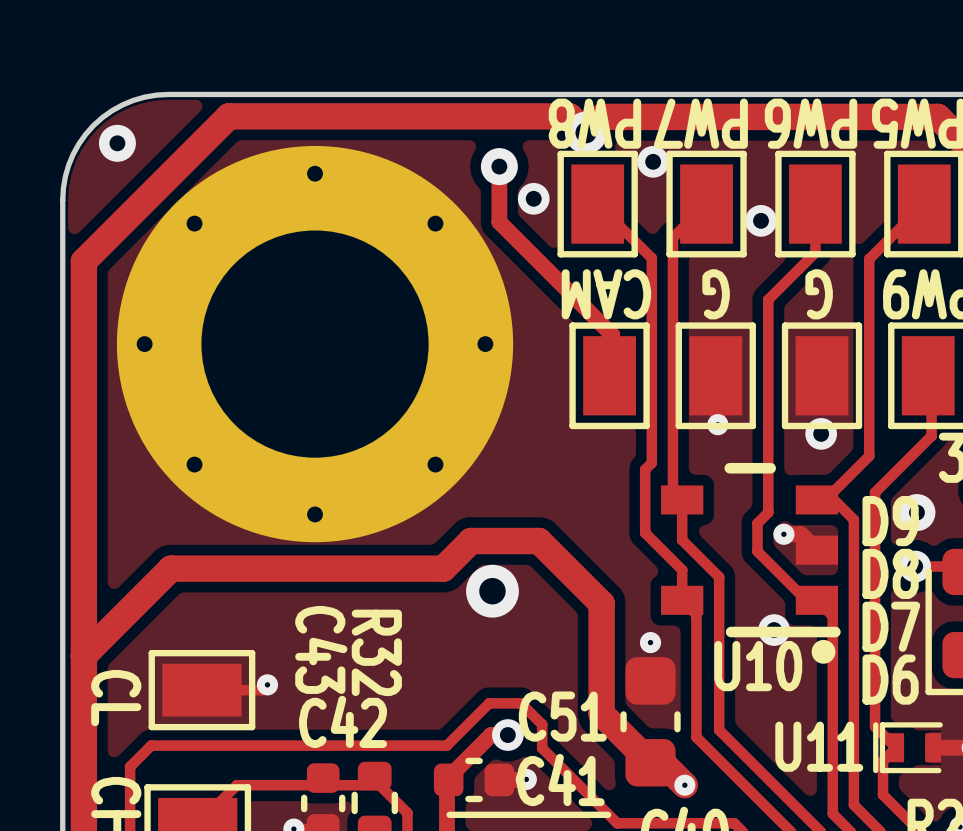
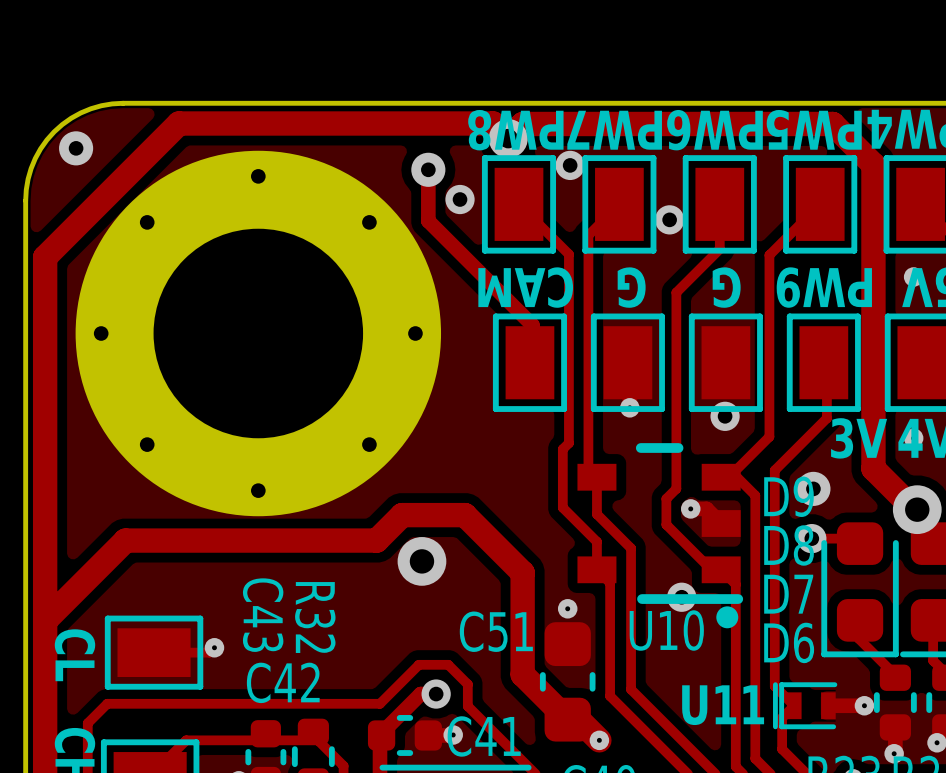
C51 name position: C51 (562, 716) -> C51 (496, 631)

